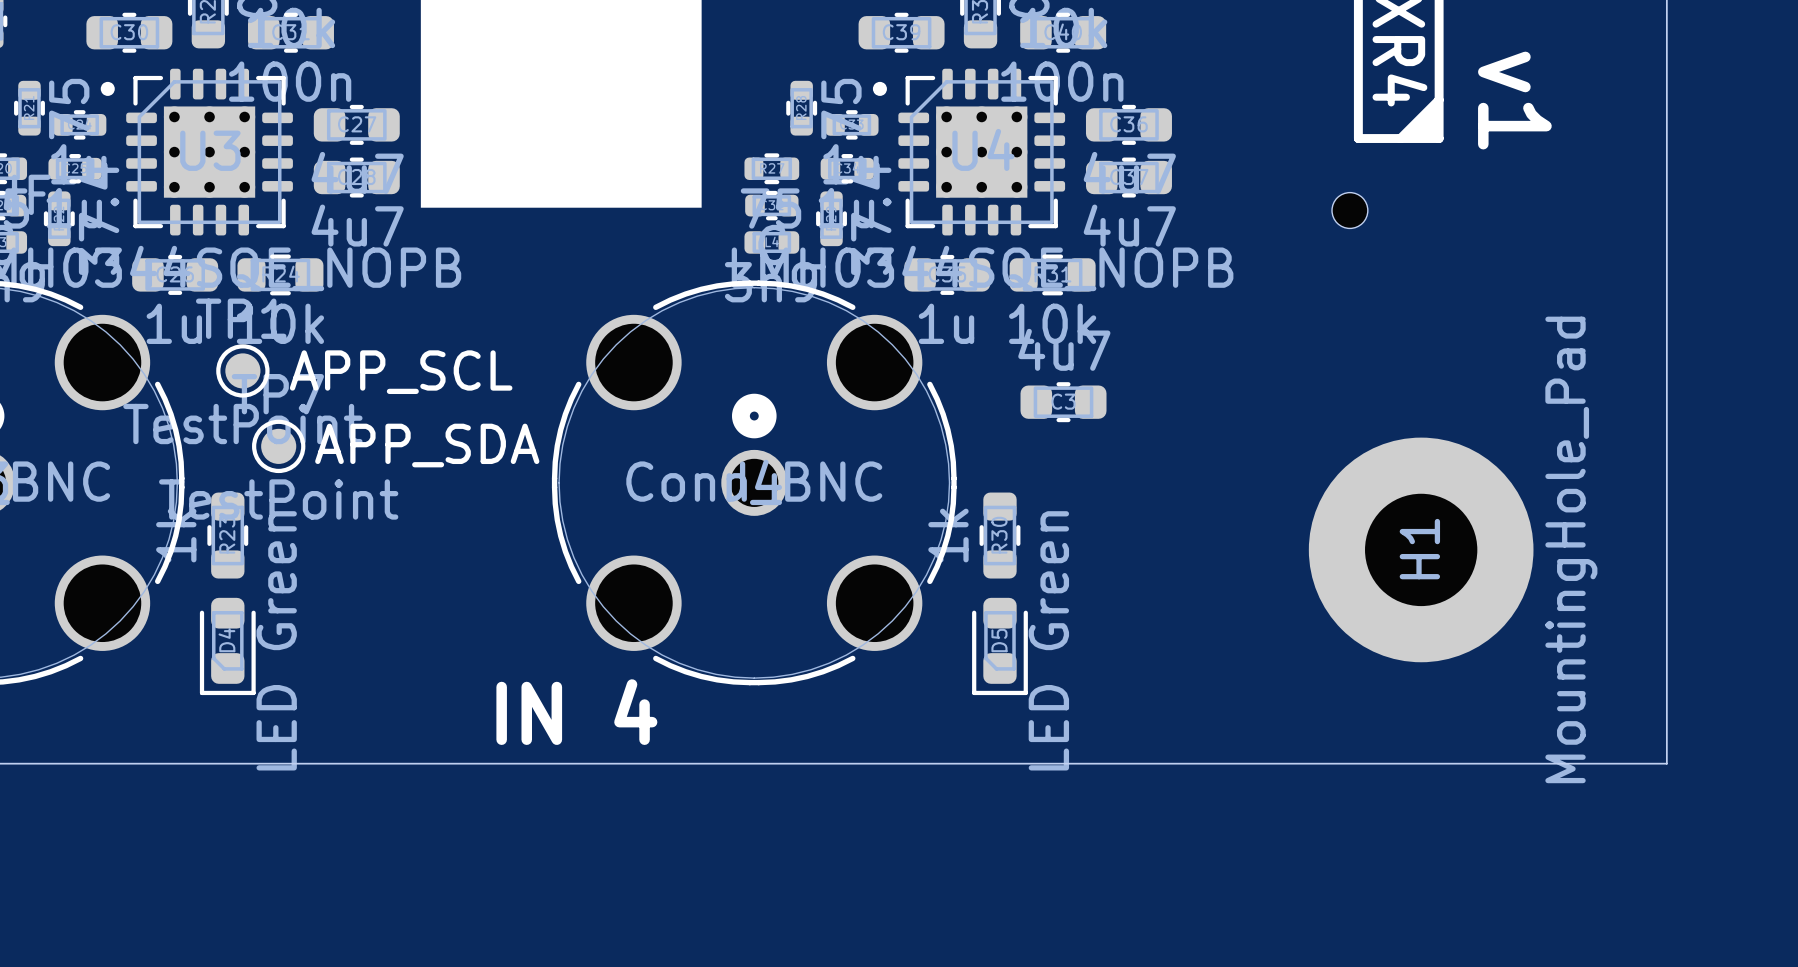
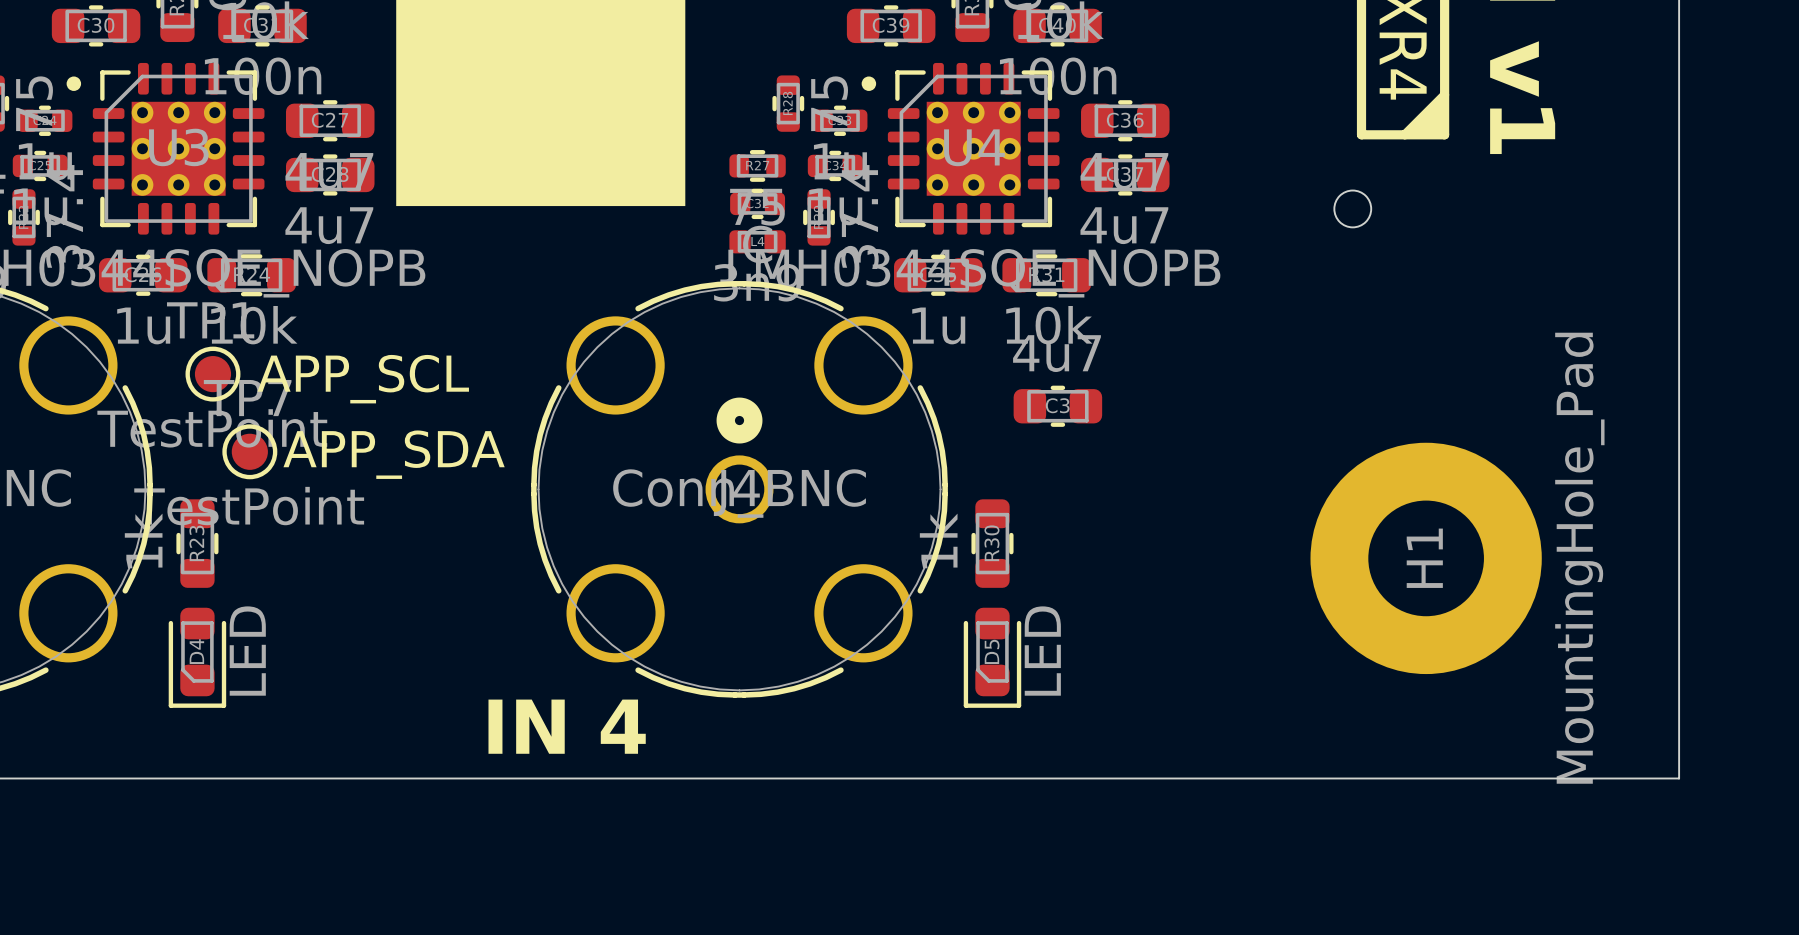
D4 value: LED Green (276, 640) -> LED (247, 651)
D5 value: LED Green (1048, 640) -> LED (1042, 651)

